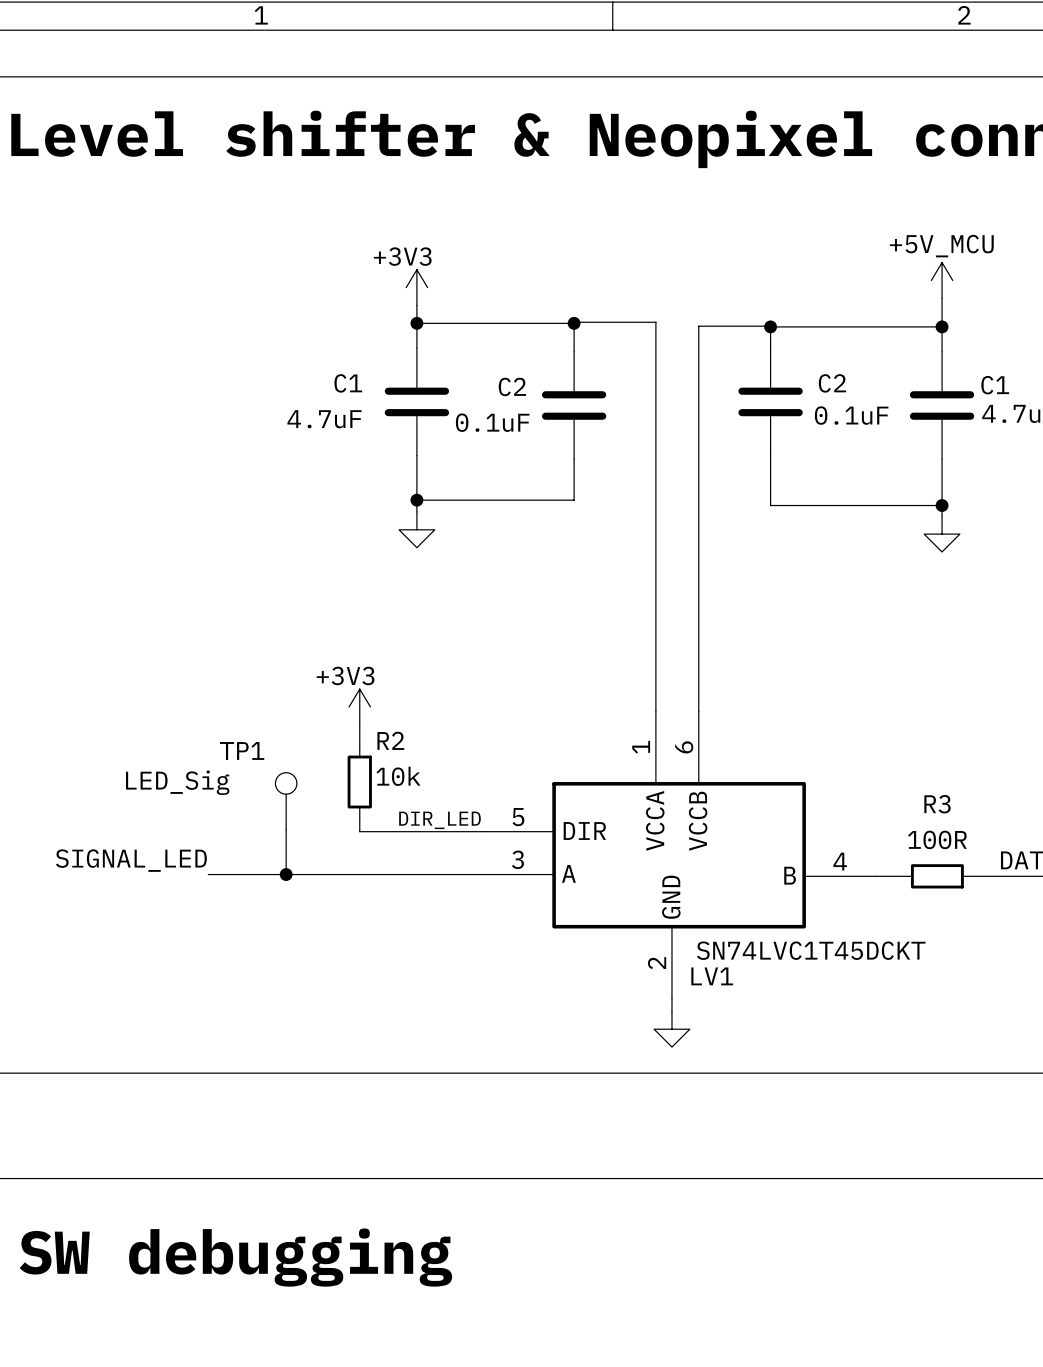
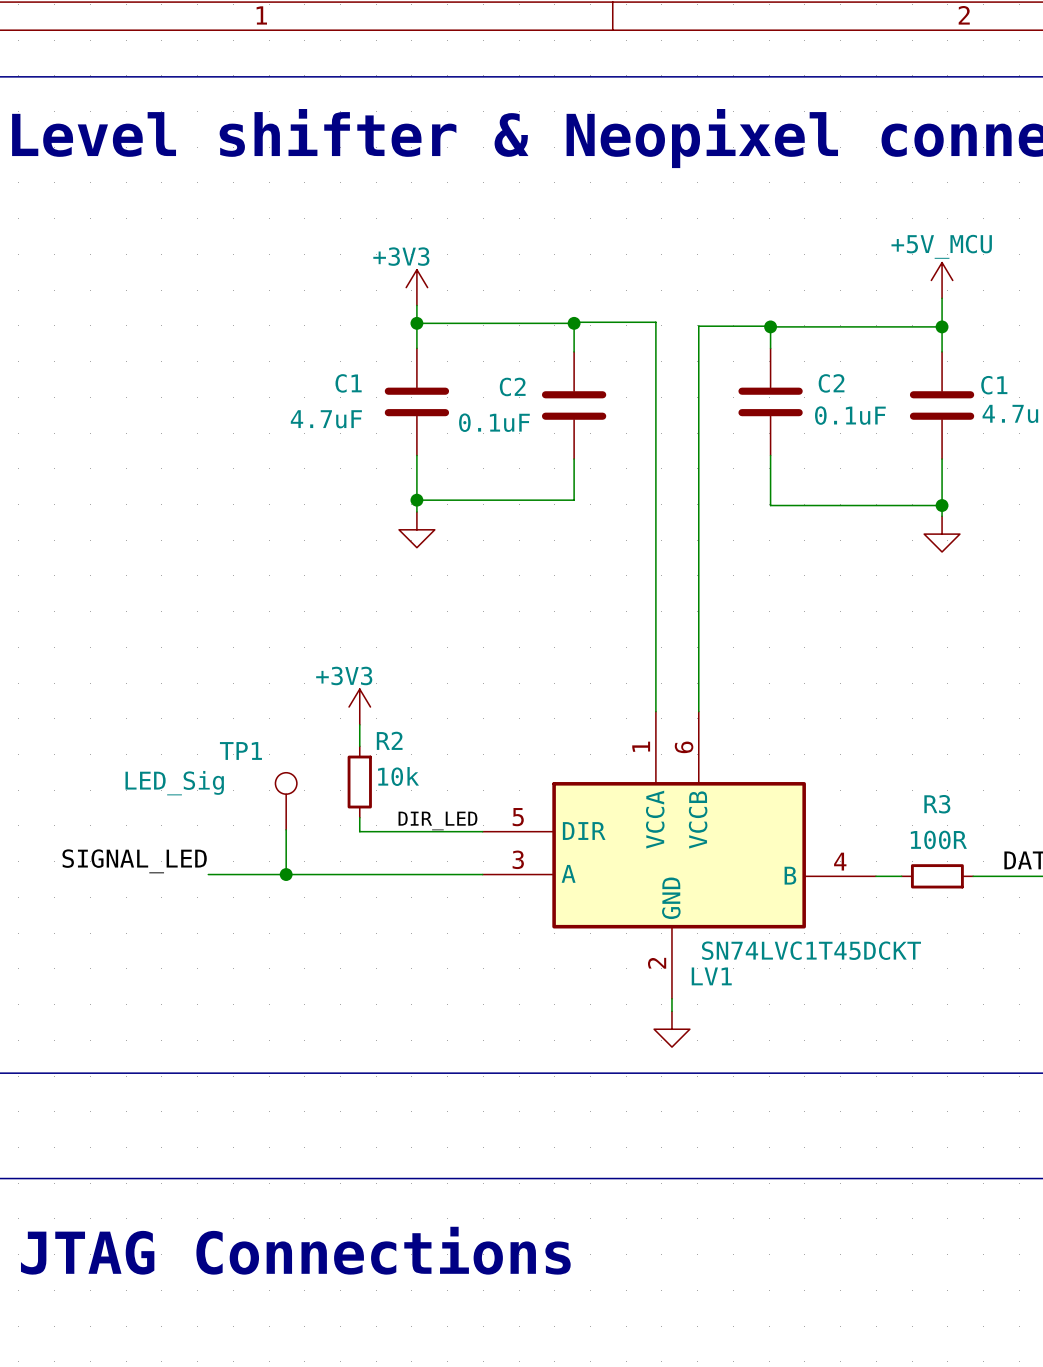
text: SW debugging (235, 1257) -> JTAG Connections (295, 1250)

